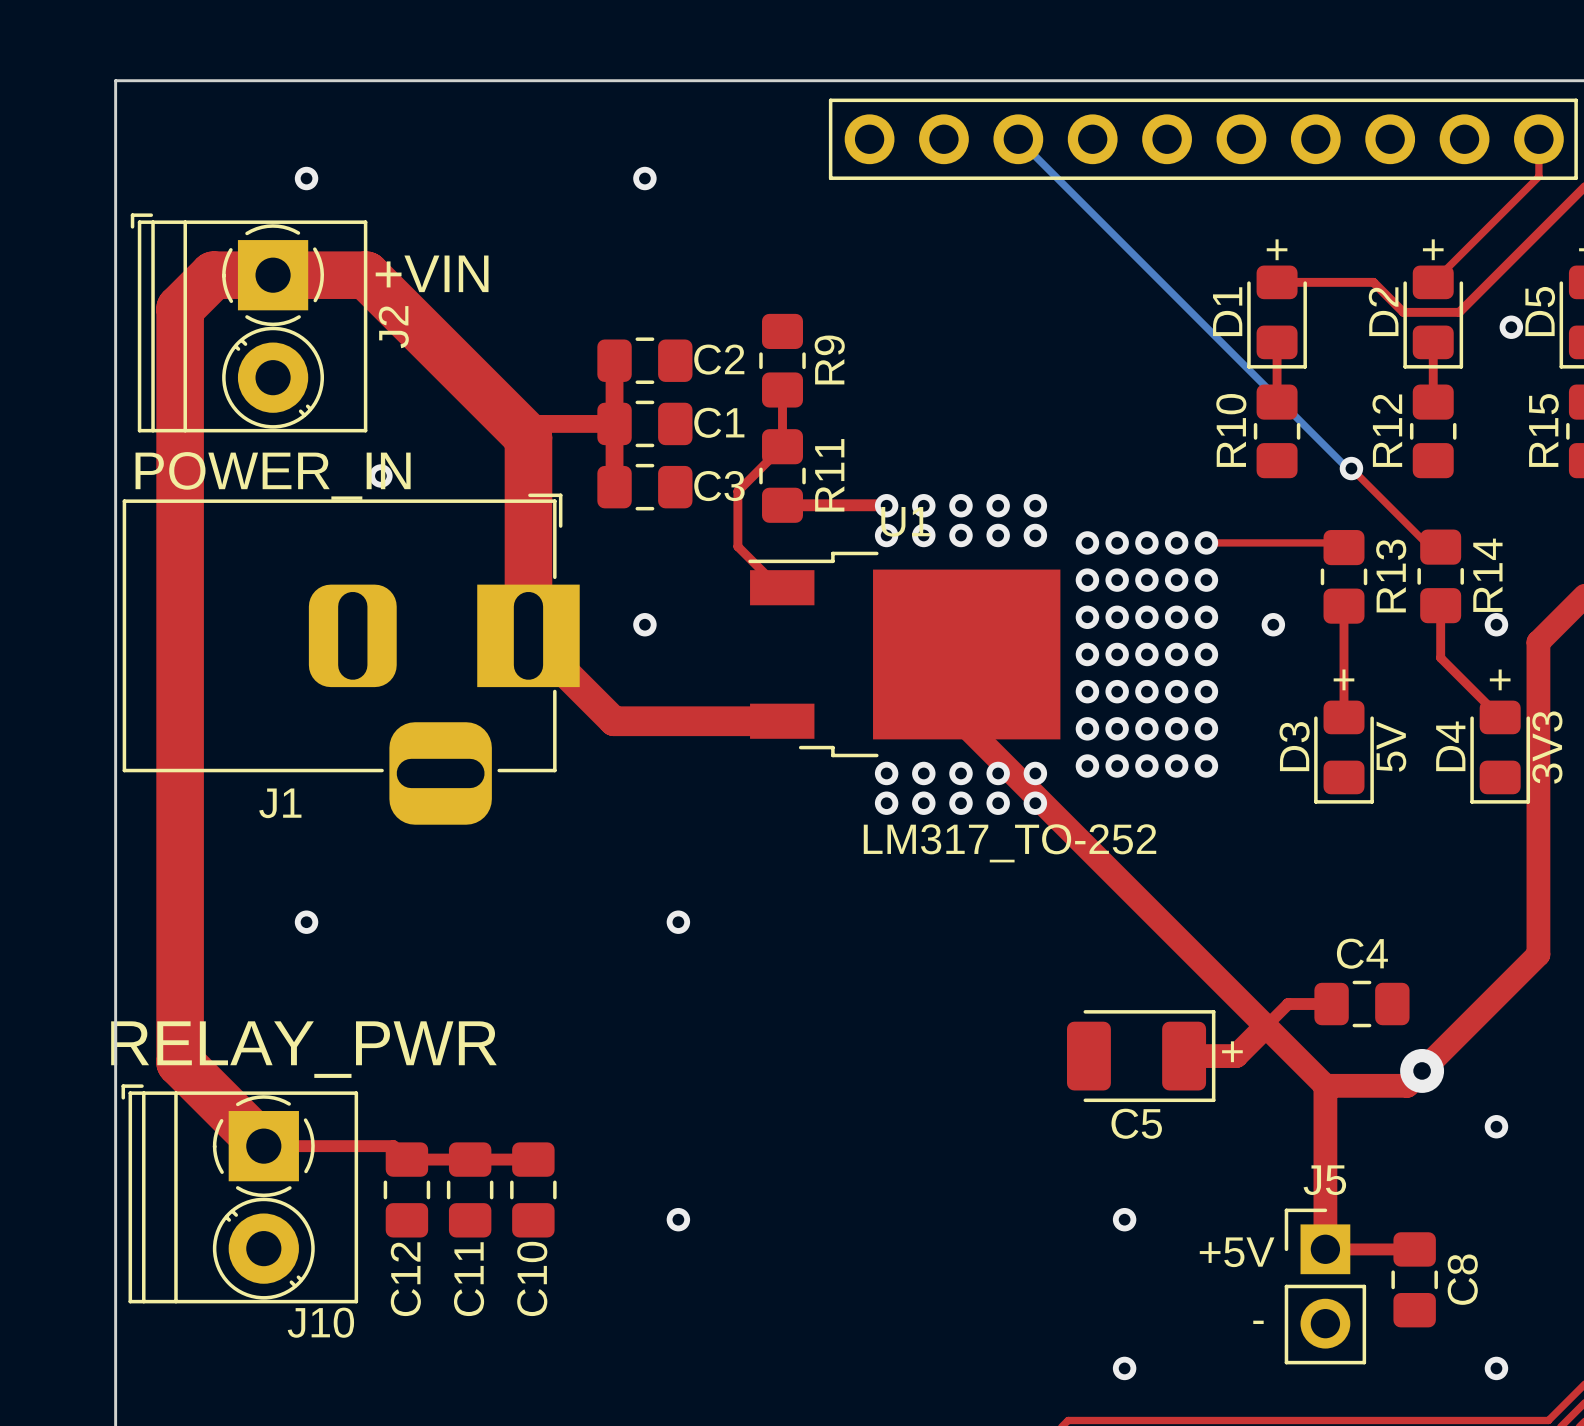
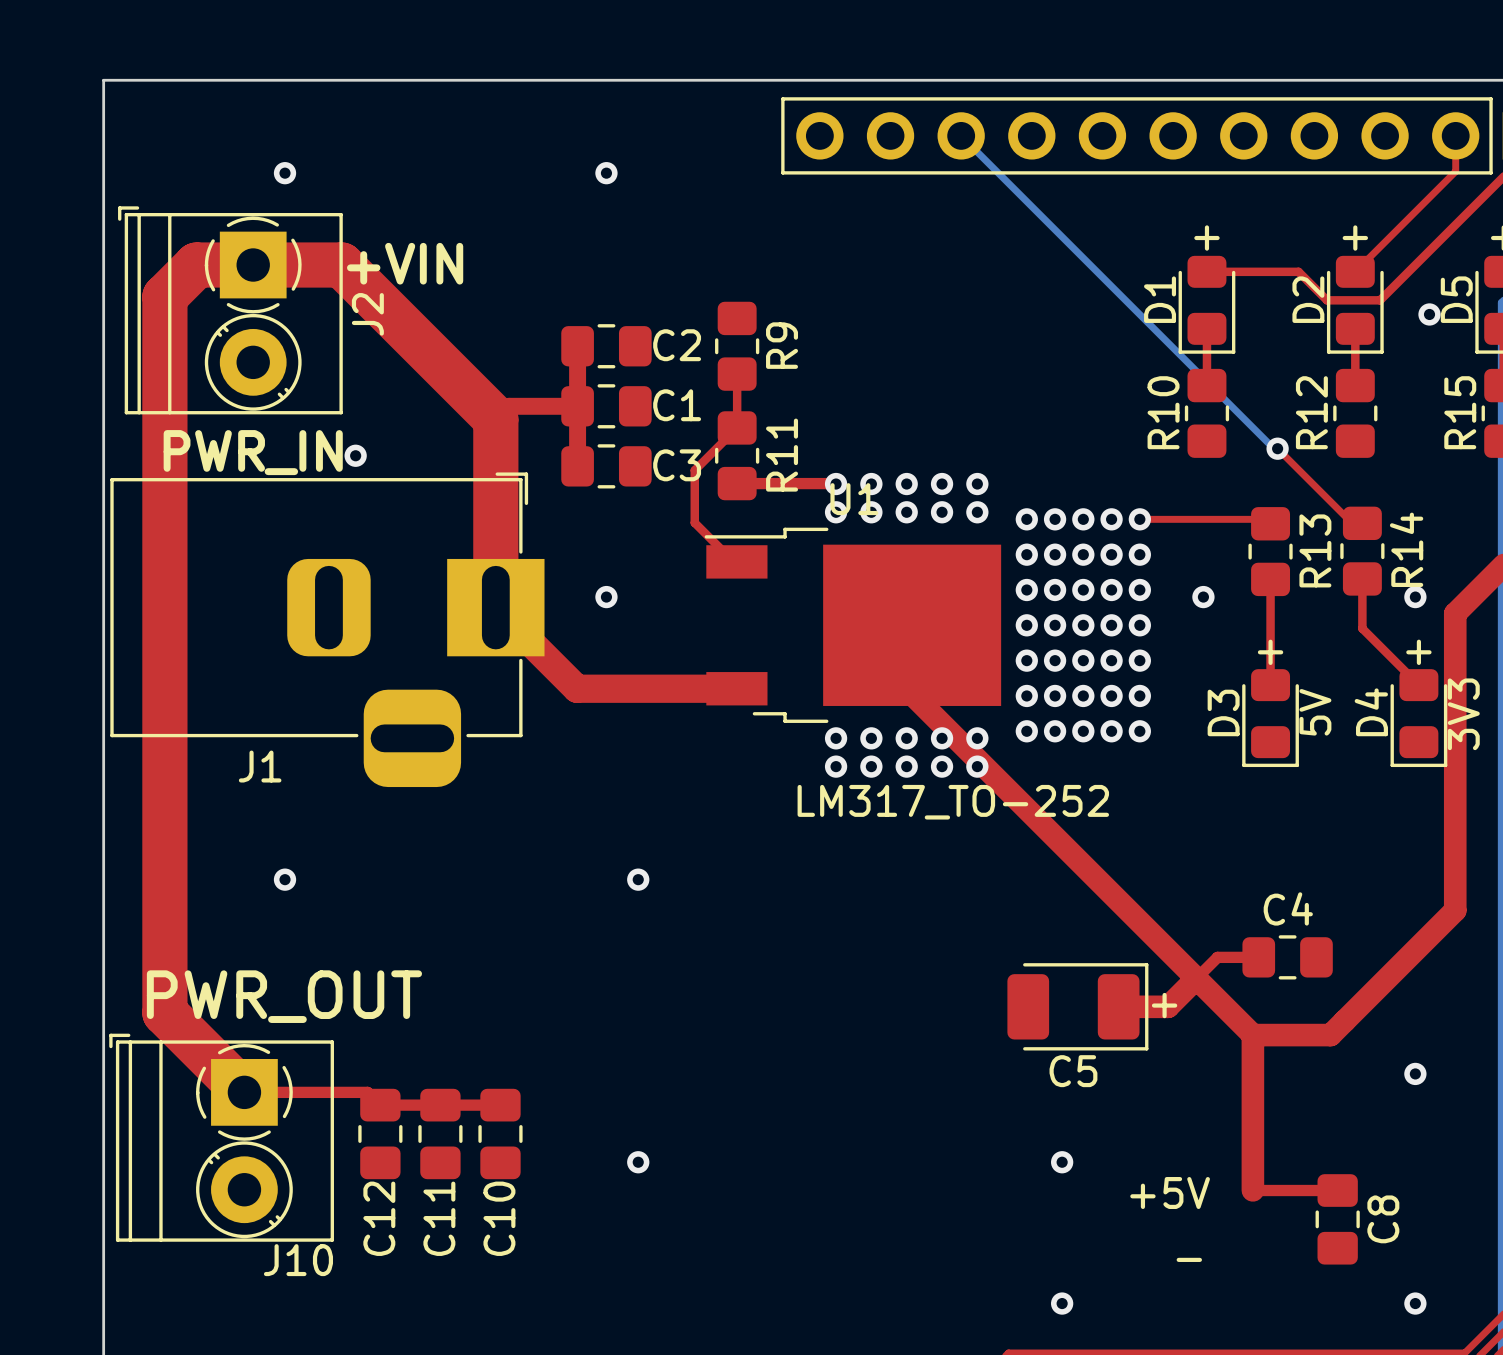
J2 value: POWER_IN (273, 475) -> PWR_IN (253, 452)
J10 value: RELAY_PWR (303, 1049) -> PWR_OUT (284, 996)
via: (1422, 1070) -> none
J5: (1325, 1286) -> none

